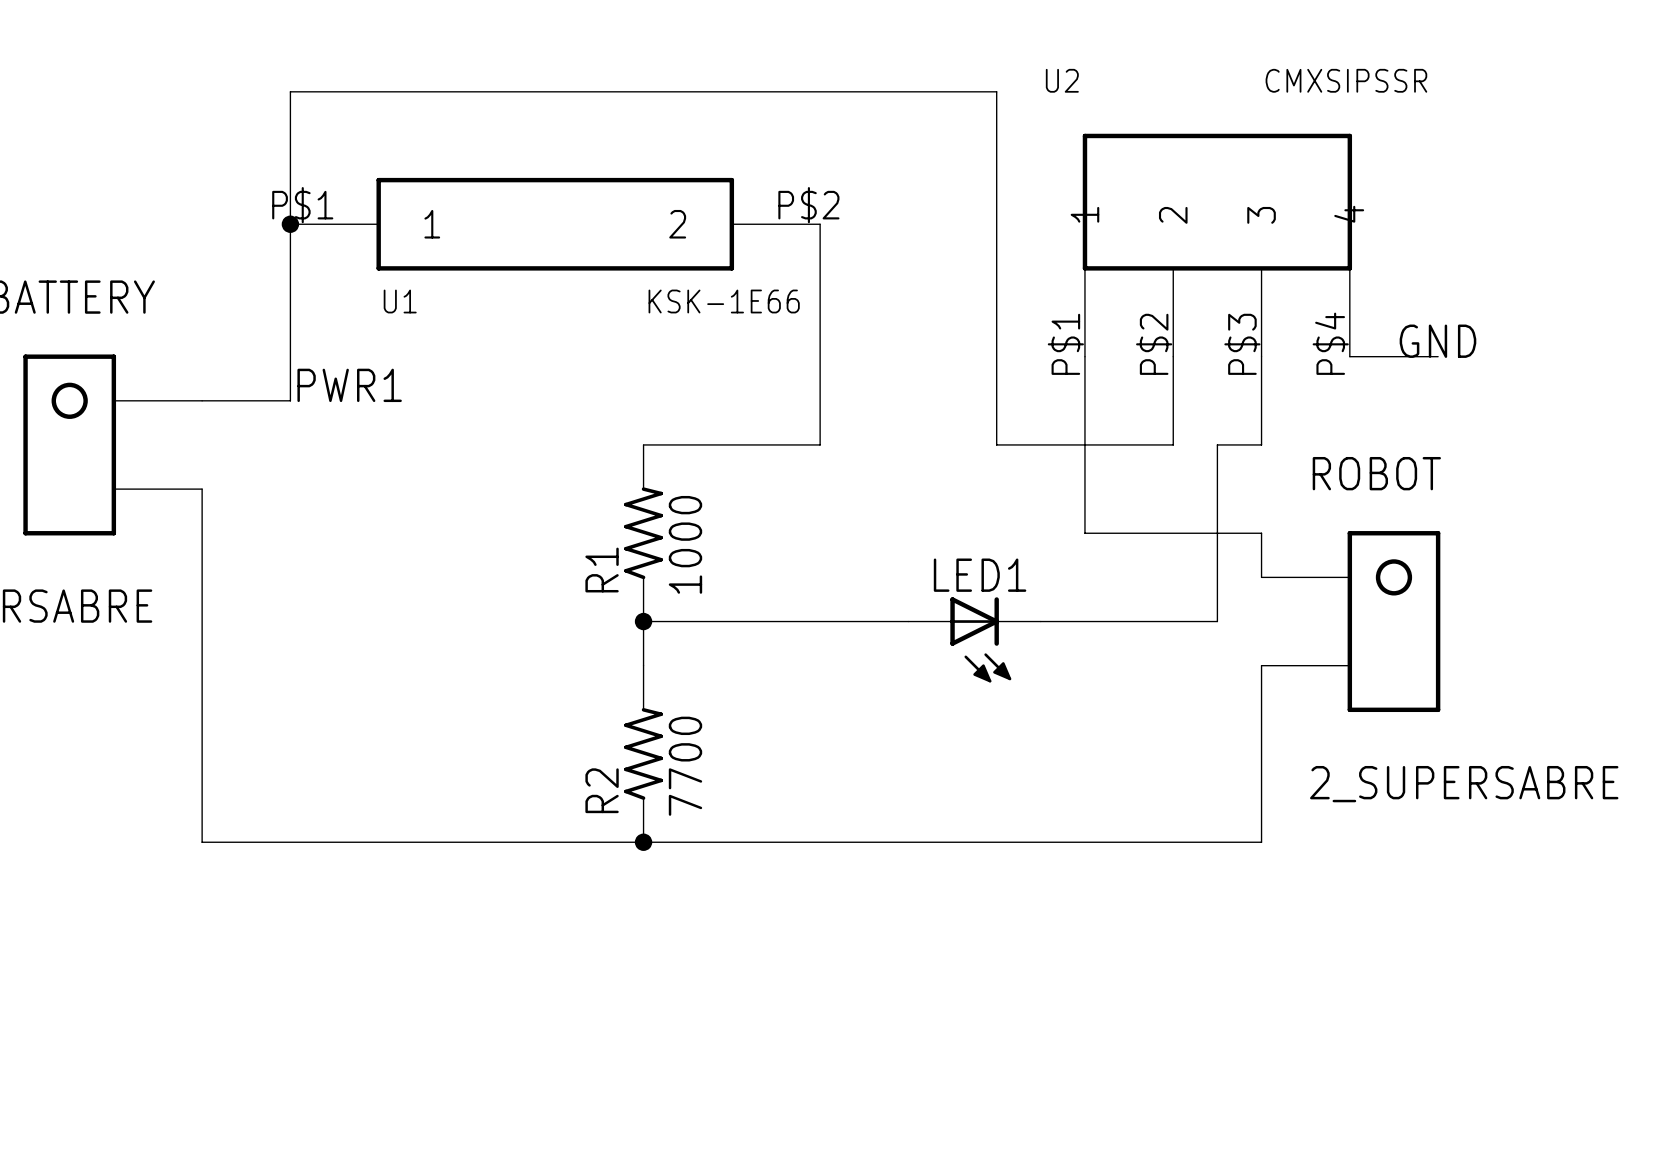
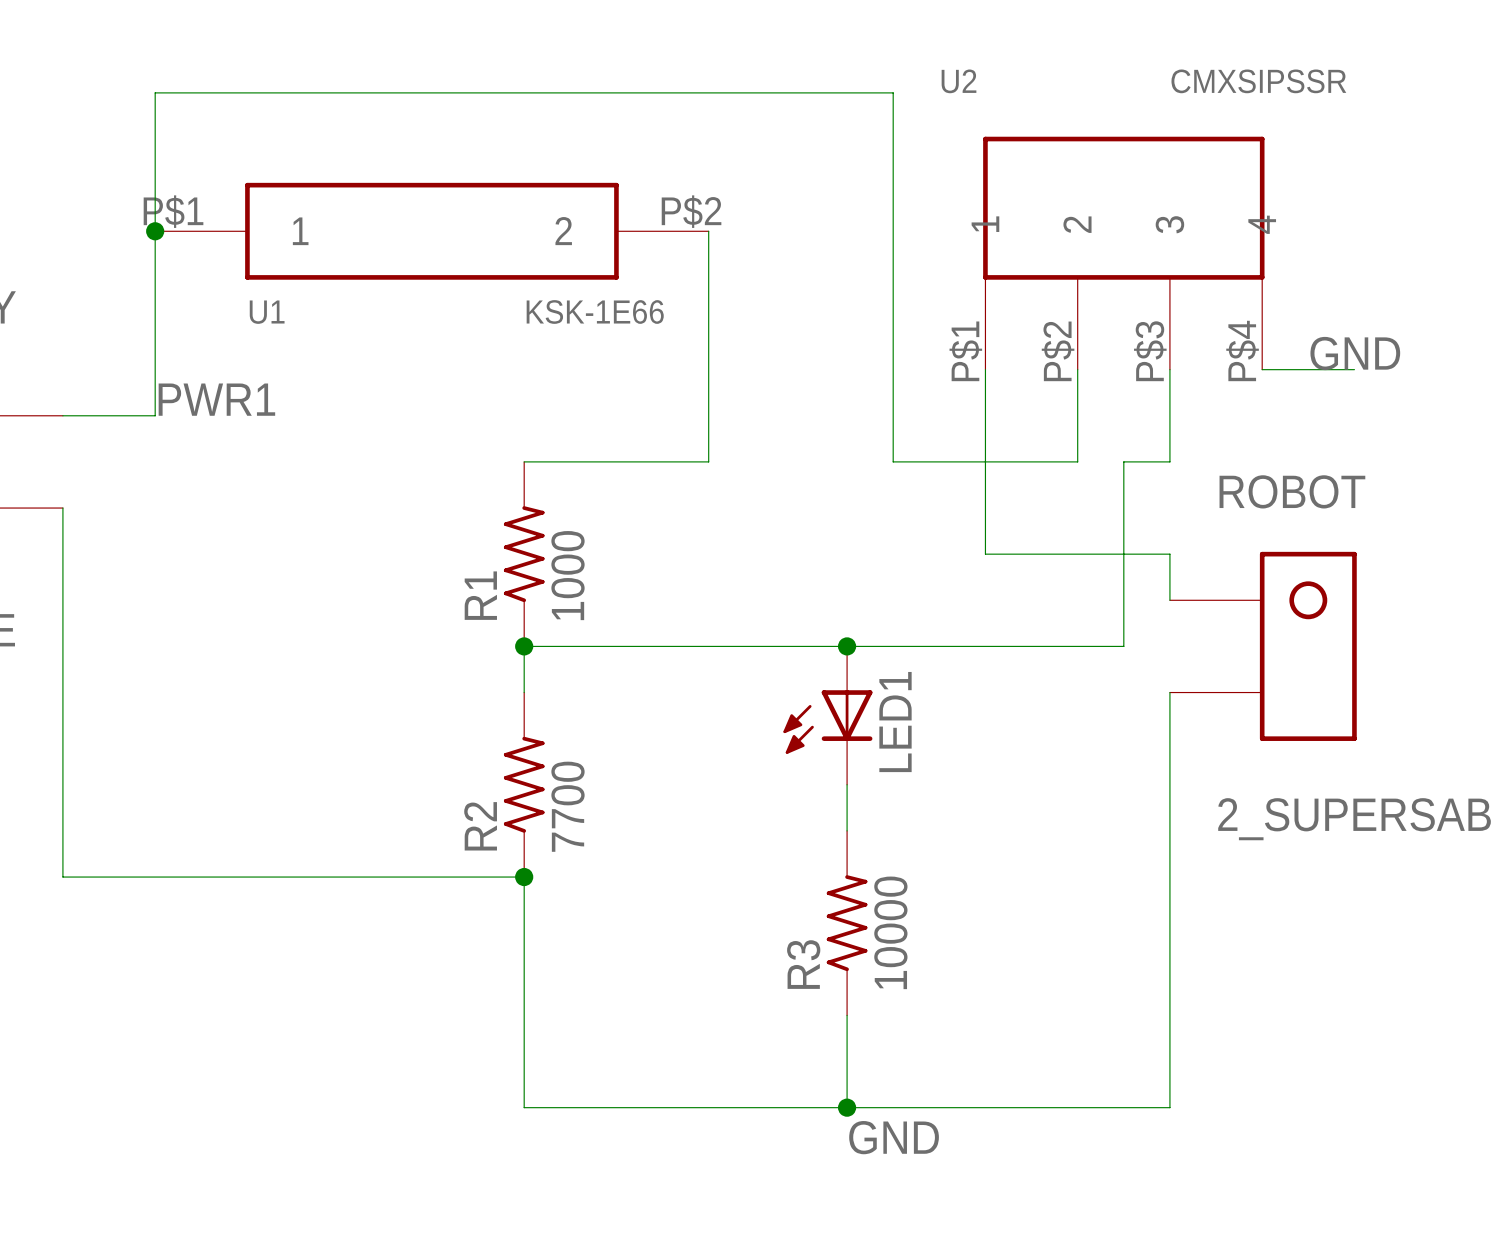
junction: none -> (847, 646)
LED1 rotation: 0° (980, 639) -> 90° clockwise (827, 722)
wire: none -> (847, 784) (847, 830)
wire: (643, 842) (1261, 842) -> (524, 877) (524, 1107) (1169, 1107) (1169, 877)
R3: none -> 10000 (847, 923)
wire: none -> (847, 1015) (847, 1107)
junction: none -> (847, 1107)
label: none -> GND (894, 1137)

